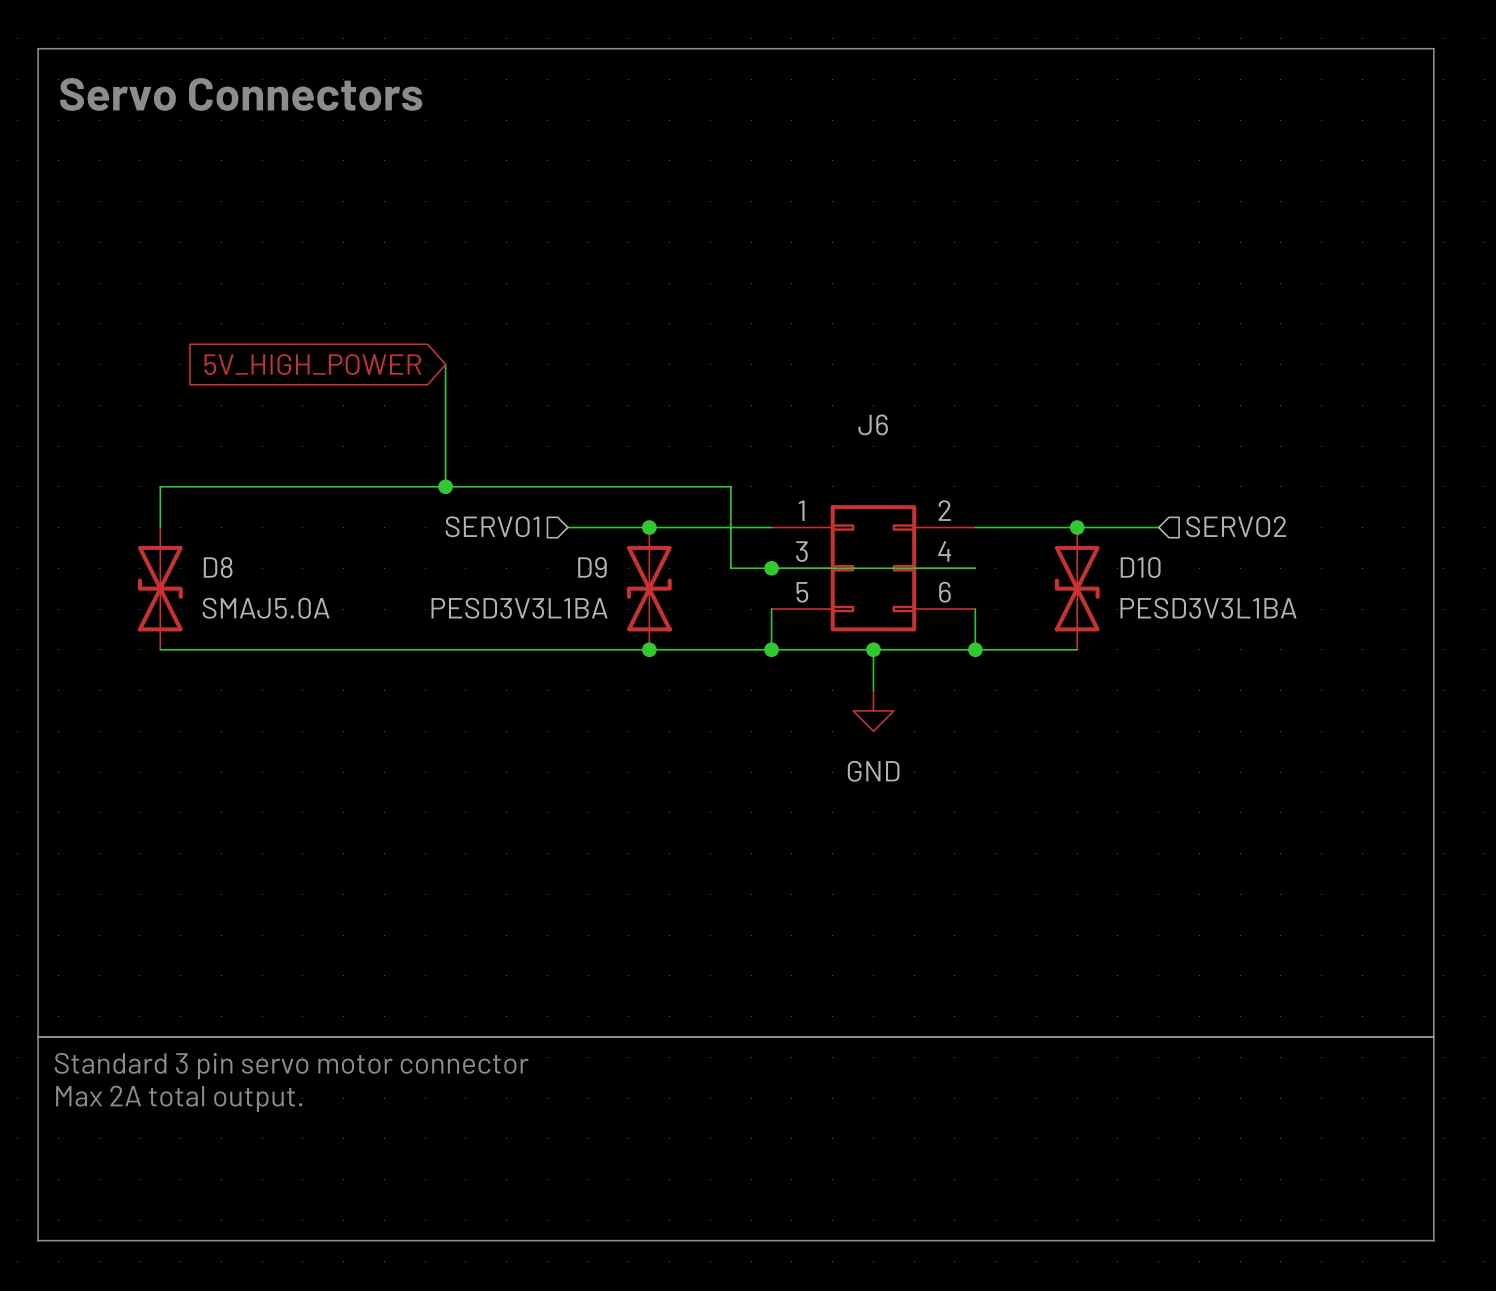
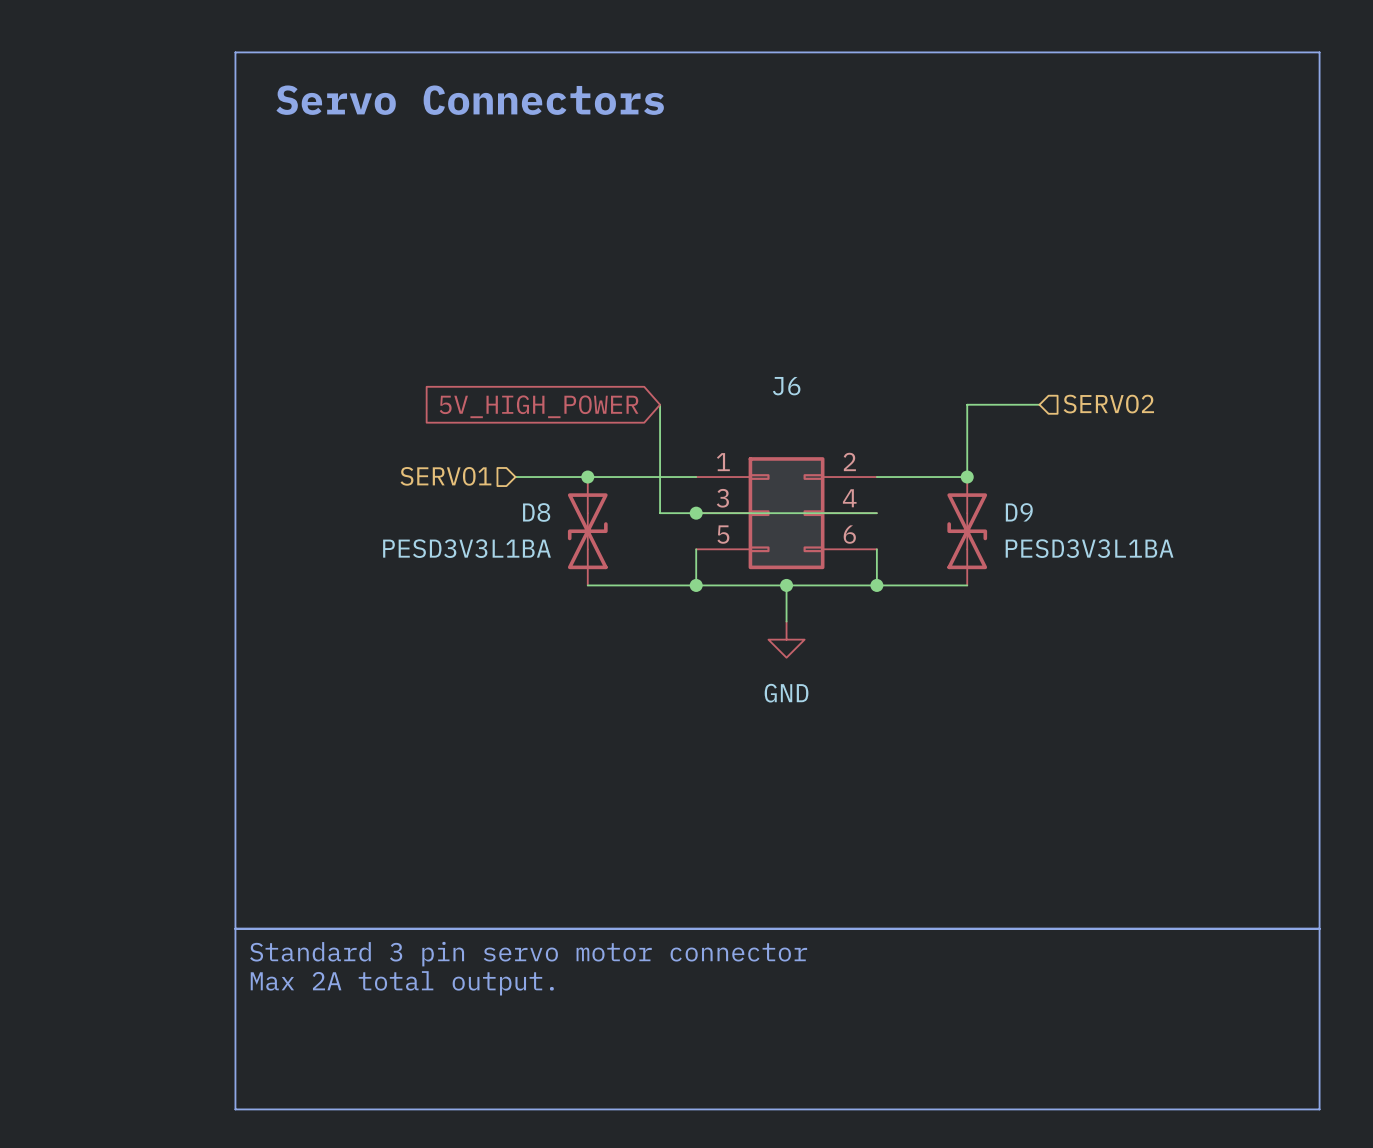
line: (252, 48) (38, 48) (38, 1240) (252, 1240) -> (235, 52) (235, 1109)
line: (1433, 48) (1433, 1240) -> (1283, 52) (1319, 52) (1319, 1109) (1283, 1109)
text position: Servo Connectors (241, 94) -> Servo Connectors (470, 100)
global label position: 5V_HIGH_POWER (312, 364) -> 5V_HIGH_POWER (539, 406)
wire: (445, 364) (445, 486) -> none
junction: (445, 486) -> none
wire: (730, 486) (160, 486) (160, 527) -> (660, 440) (660, 404)
hierarchical label position: SERVO2 (1236, 526) -> SERVO2 (1108, 404)
wire: (1077, 527) (1158, 527) -> (967, 477) (967, 404) (1039, 404)
D9 name: D9 (592, 567) -> D8 (536, 512)
D10 name: D10 (1140, 567) -> D9 (1019, 512)
D8: SMAJ5.0A (160, 588) -> none
wire: (160, 649) (649, 649) -> none
junction: (649, 649) -> none
line: (38, 1036) (252, 1036) -> none
line: none -> (1283, 928) (1319, 928)
text position: Standard 3 pin servo motor connector (291, 1066) -> Standard 3 pin servo motor connector (528, 954)
text position: Max 2A total output. (179, 1098) -> Max 2A total output. (402, 983)

